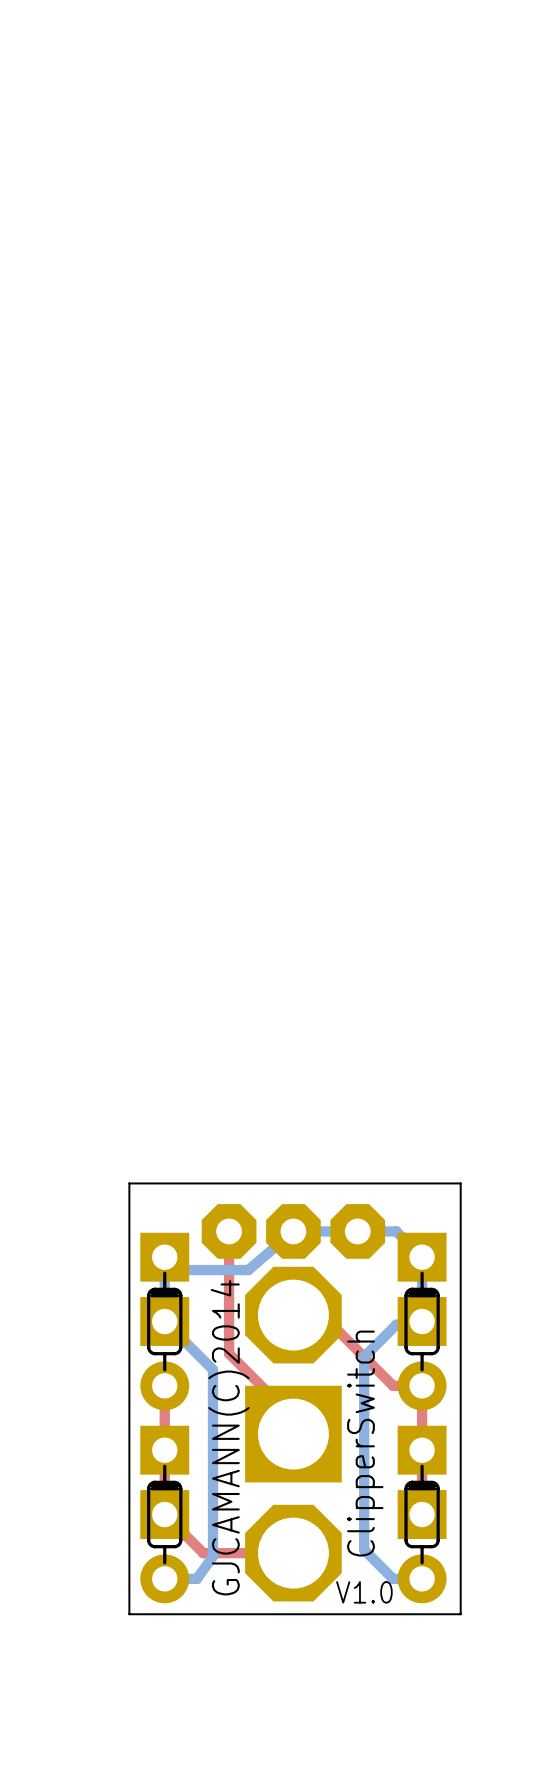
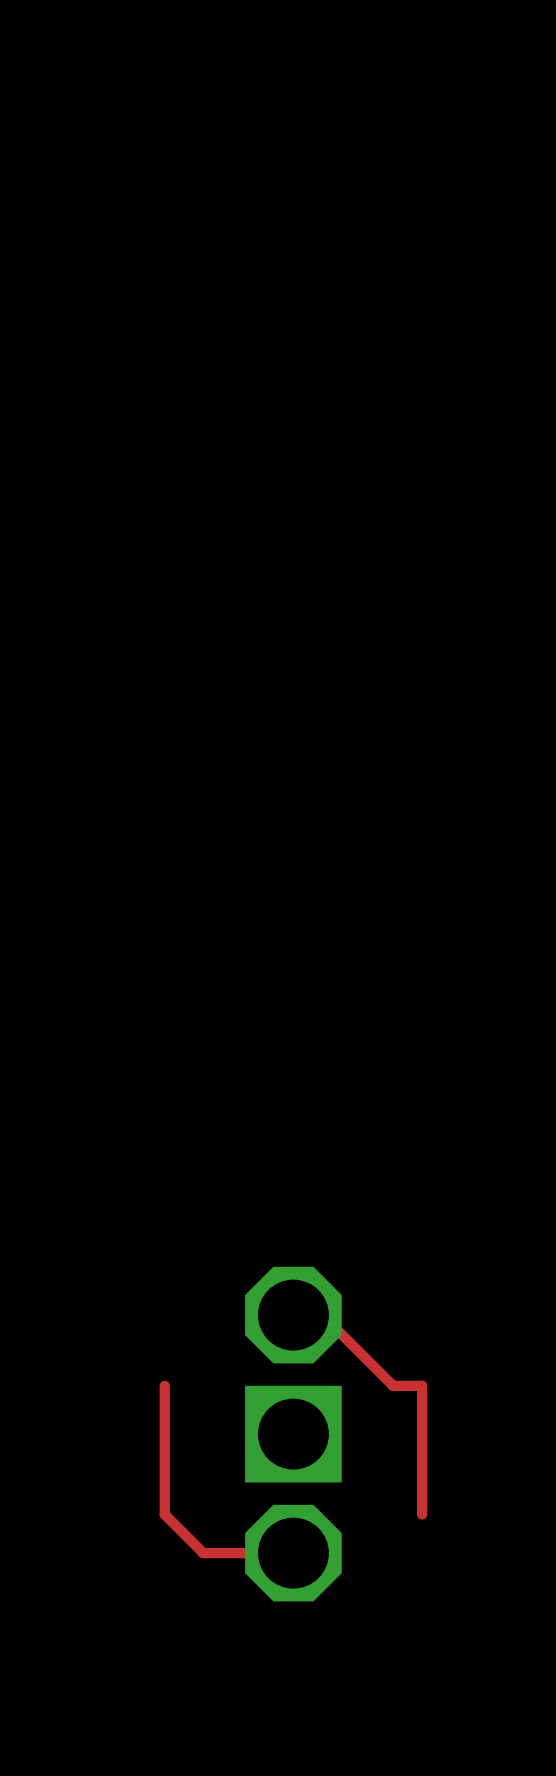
board edge: (460, 1183) (129, 1183) (129, 1614) (460, 1614) (460, 1183) -> none
top track: (229, 1231) (229, 1353) (293, 1418) (293, 1434) -> none
part: (229, 1231) -> none
part: (293, 1231) -> none
part: (357, 1231) -> none
bottom track: (164, 1257) (164, 1321) (213, 1369) (213, 1556) (196, 1578) (164, 1578) -> none
bottom track: (164, 1270) (248, 1270) (293, 1231) (396, 1231) (422, 1257) (422, 1321) (418, 1324) (396, 1324) (364, 1356) (364, 1549) (393, 1578) (422, 1578) -> none
part: (164, 1321) -> none
part: (422, 1321) -> none
text: GJCAMANN(C)2014 (228, 1437) -> none
text: ClipperSwitch (365, 1443) -> none
part: (164, 1514) -> none
part: (422, 1514) -> none
text: V1.0 (364, 1592) -> none

